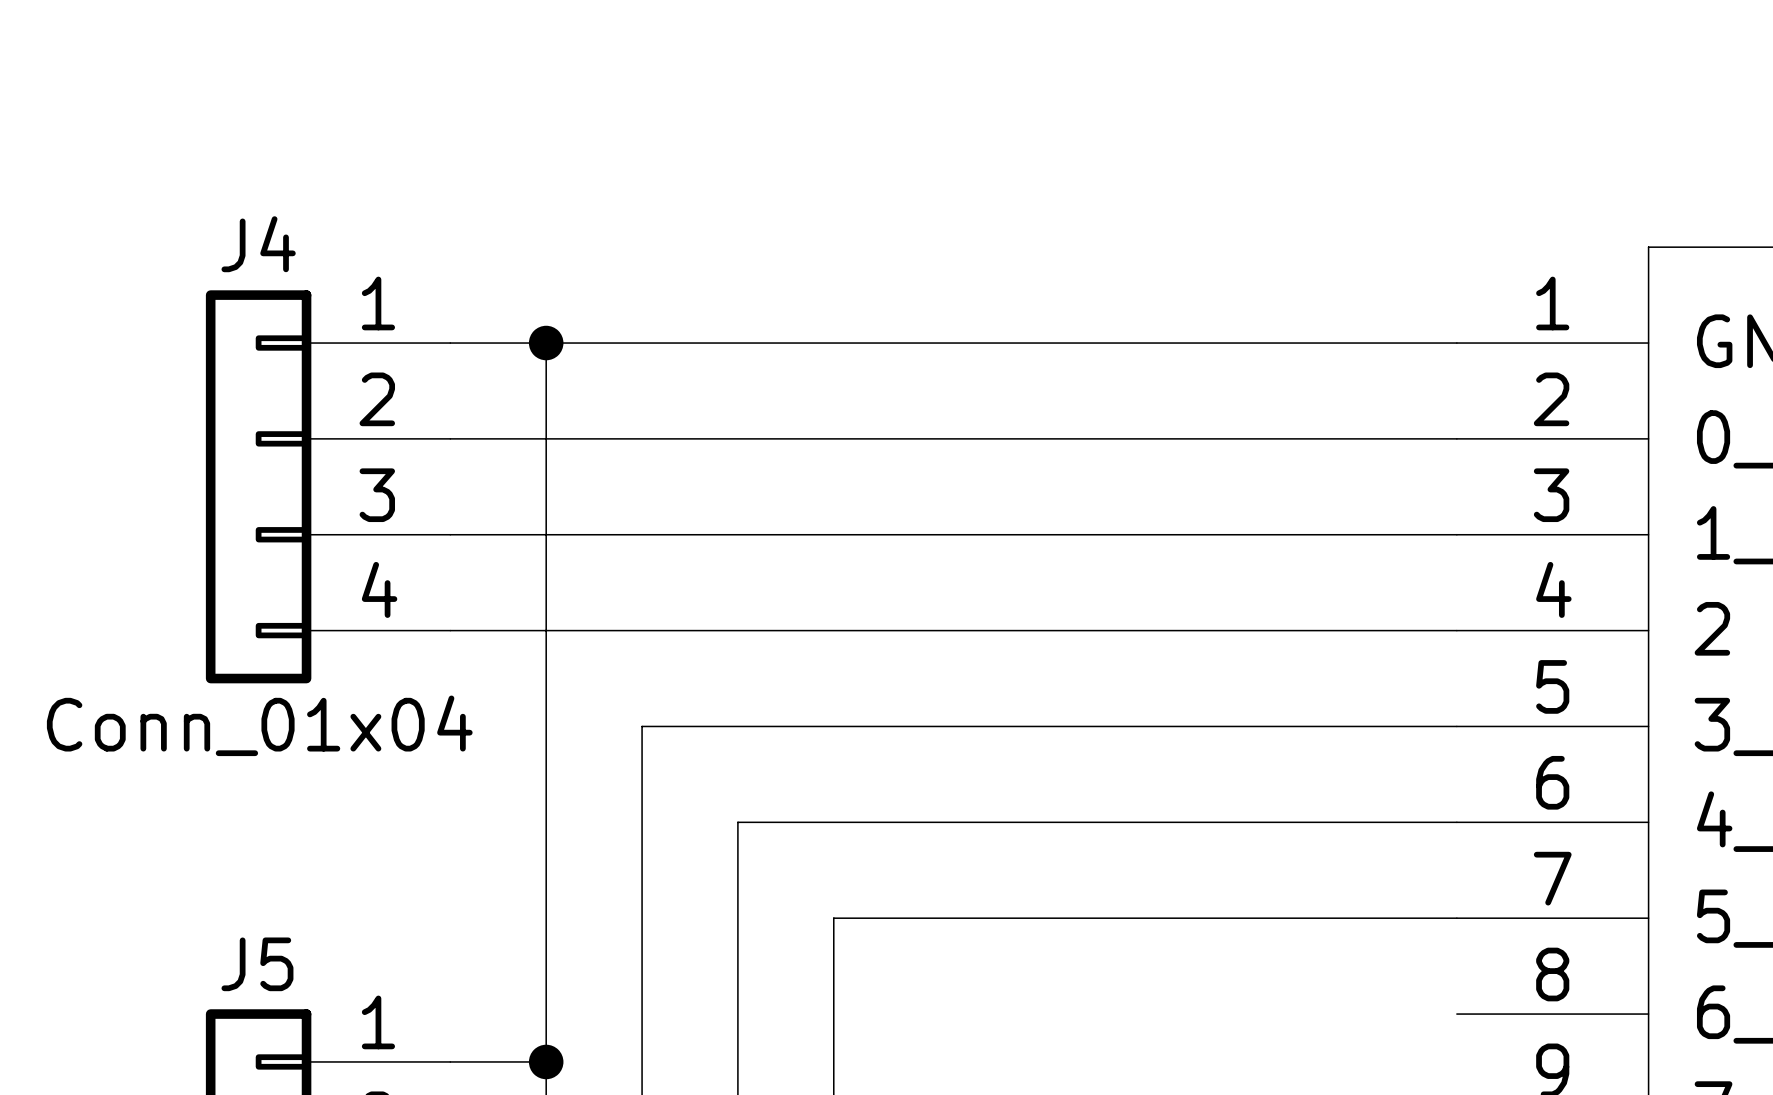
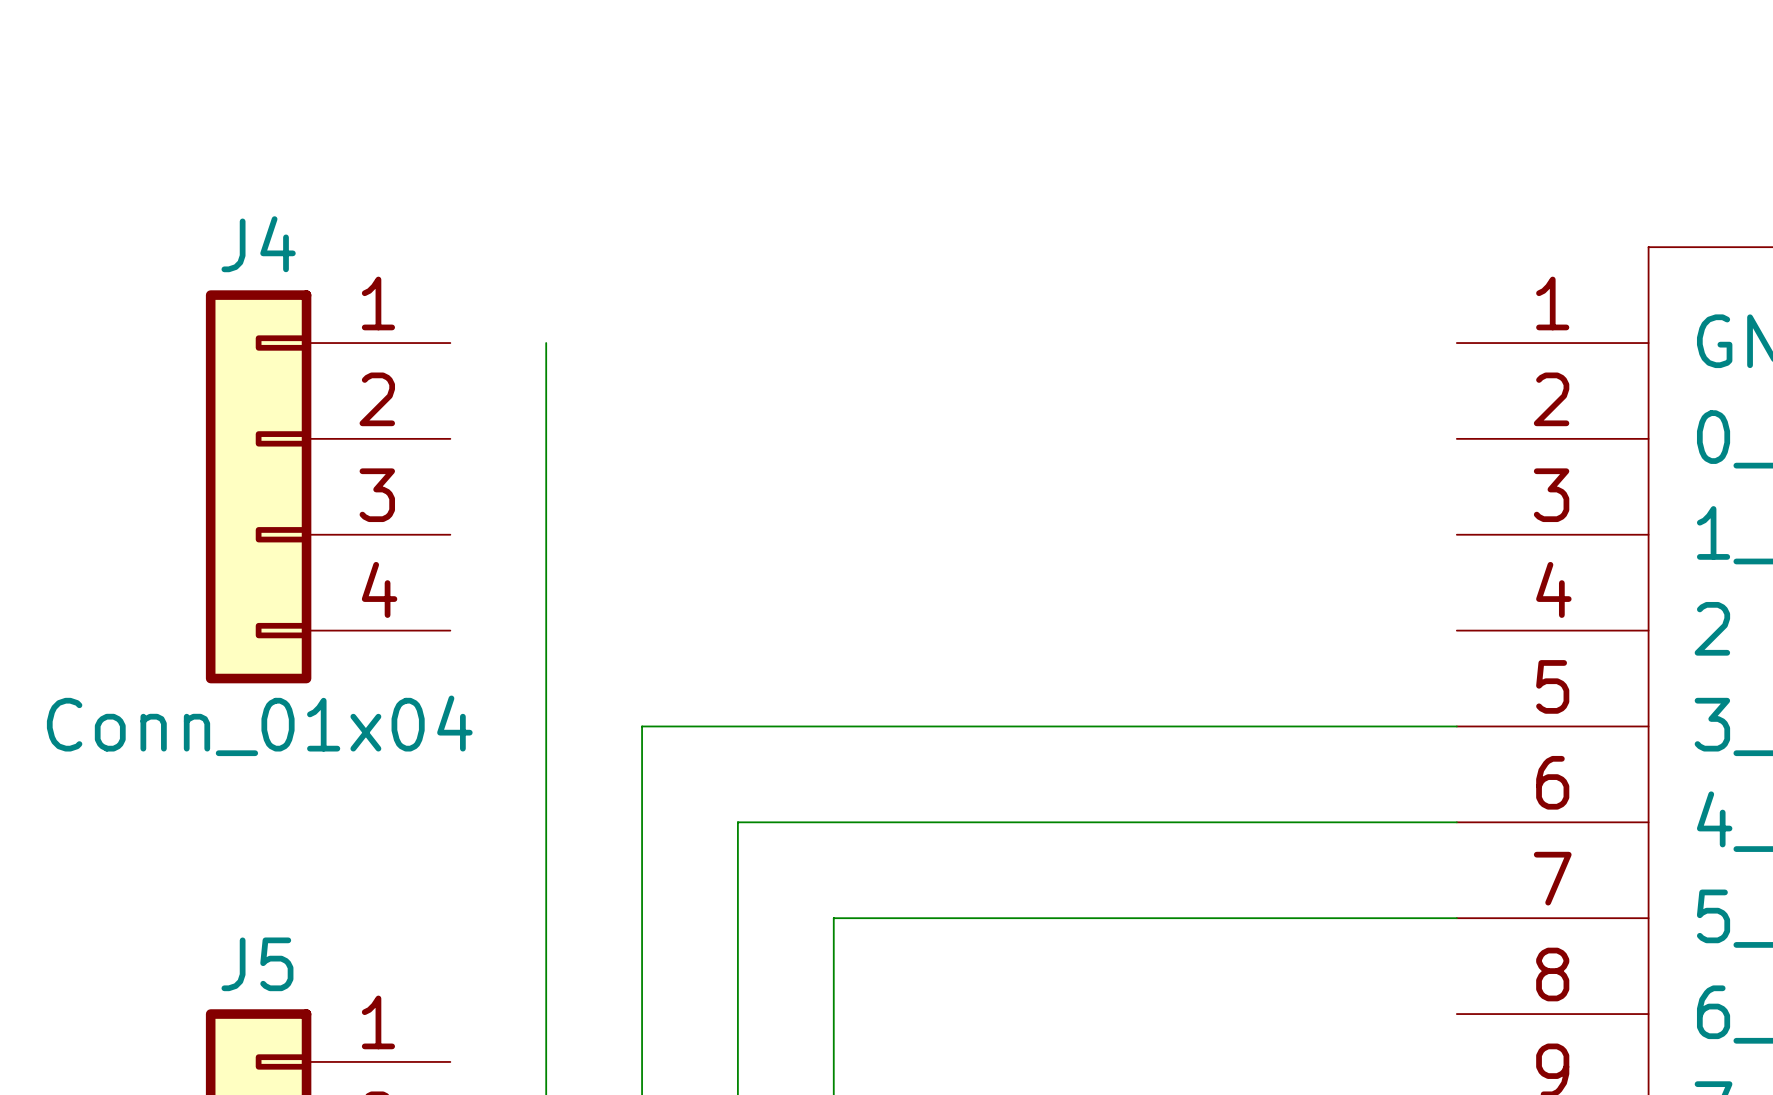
wire: (450, 343) (1456, 343) -> none
junction: (546, 343) -> none
wire: (450, 438) (1456, 438) -> none
wire: (450, 534) (1456, 534) -> none
wire: (450, 630) (1456, 630) -> none
wire: (450, 1061) (546, 1061) -> none
junction: (546, 1061) -> none

